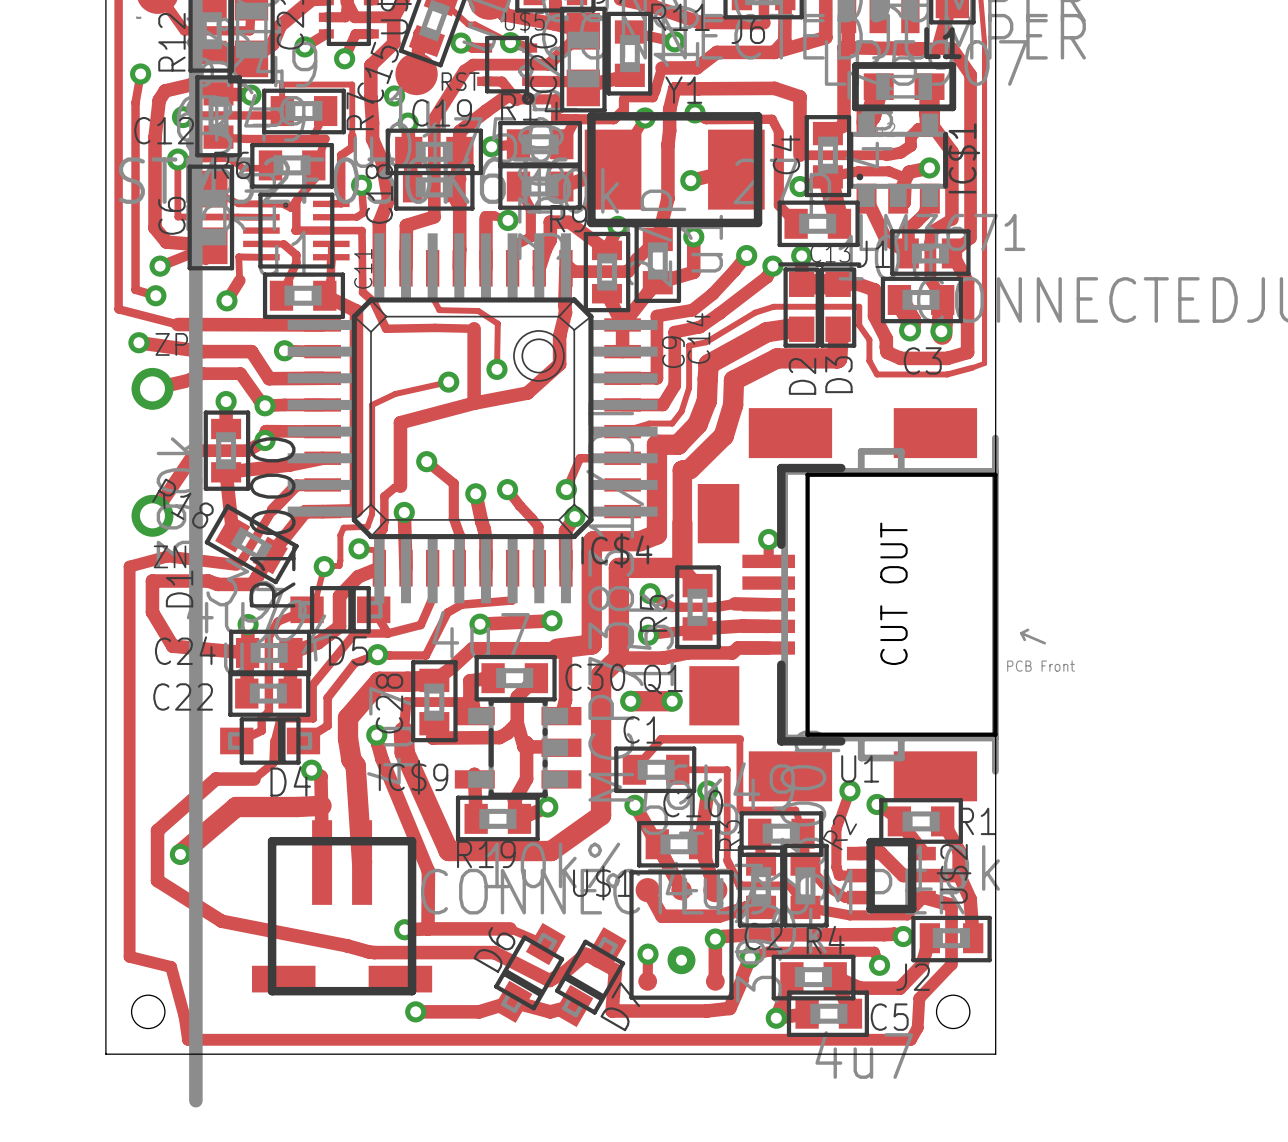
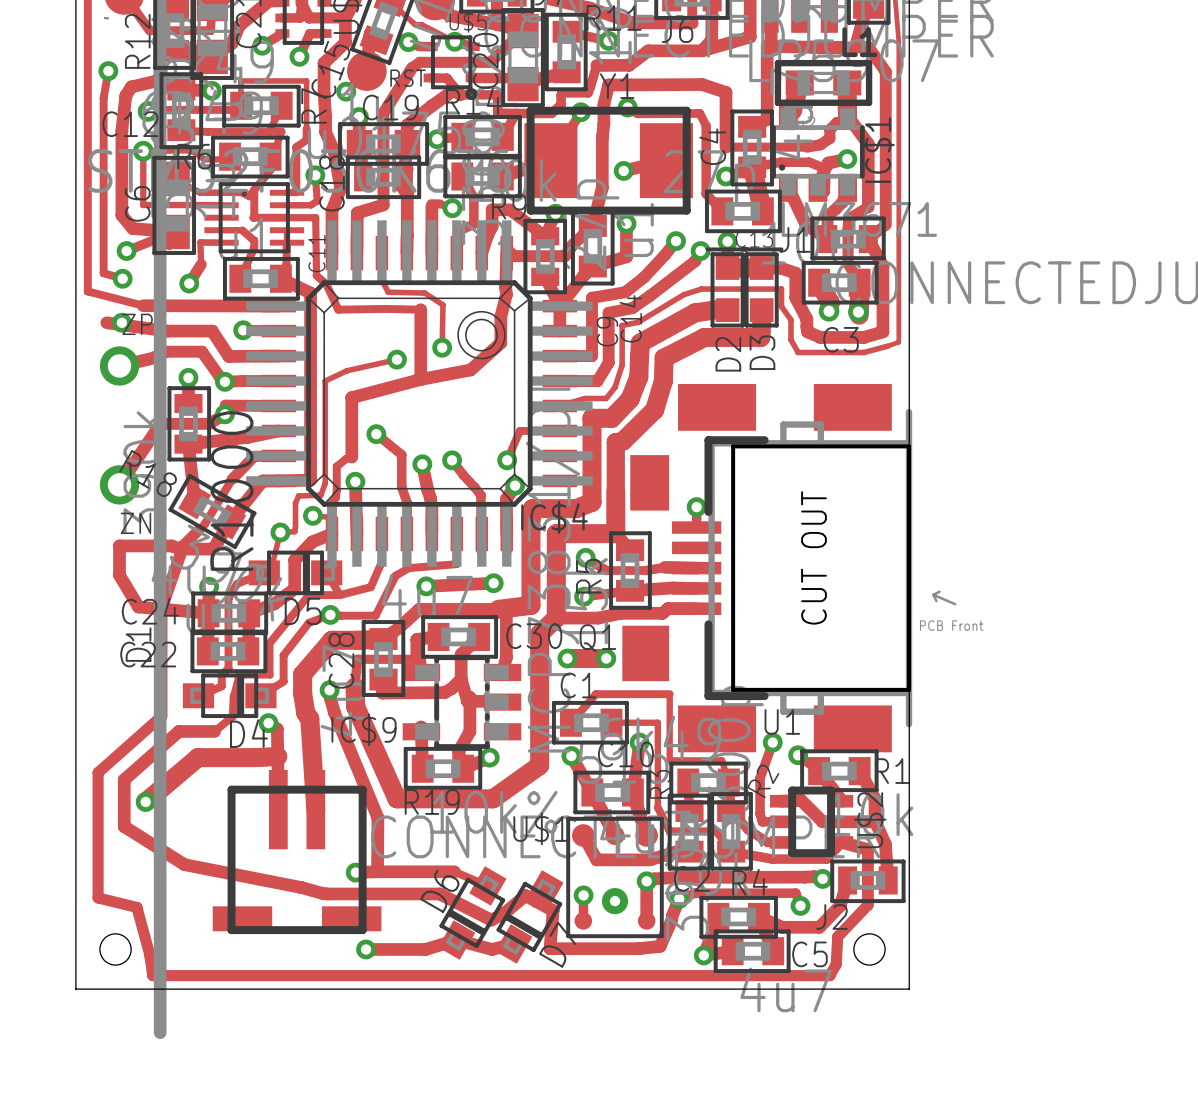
via position: (138, 342) -> (121, 322)
track: (236, 564) (167, 556) (129, 566) (129, 823) -> (197, 530) (183, 545) (161, 608) (161, 716) (98, 772)
D1 position: (179, 588) -> (138, 644)

